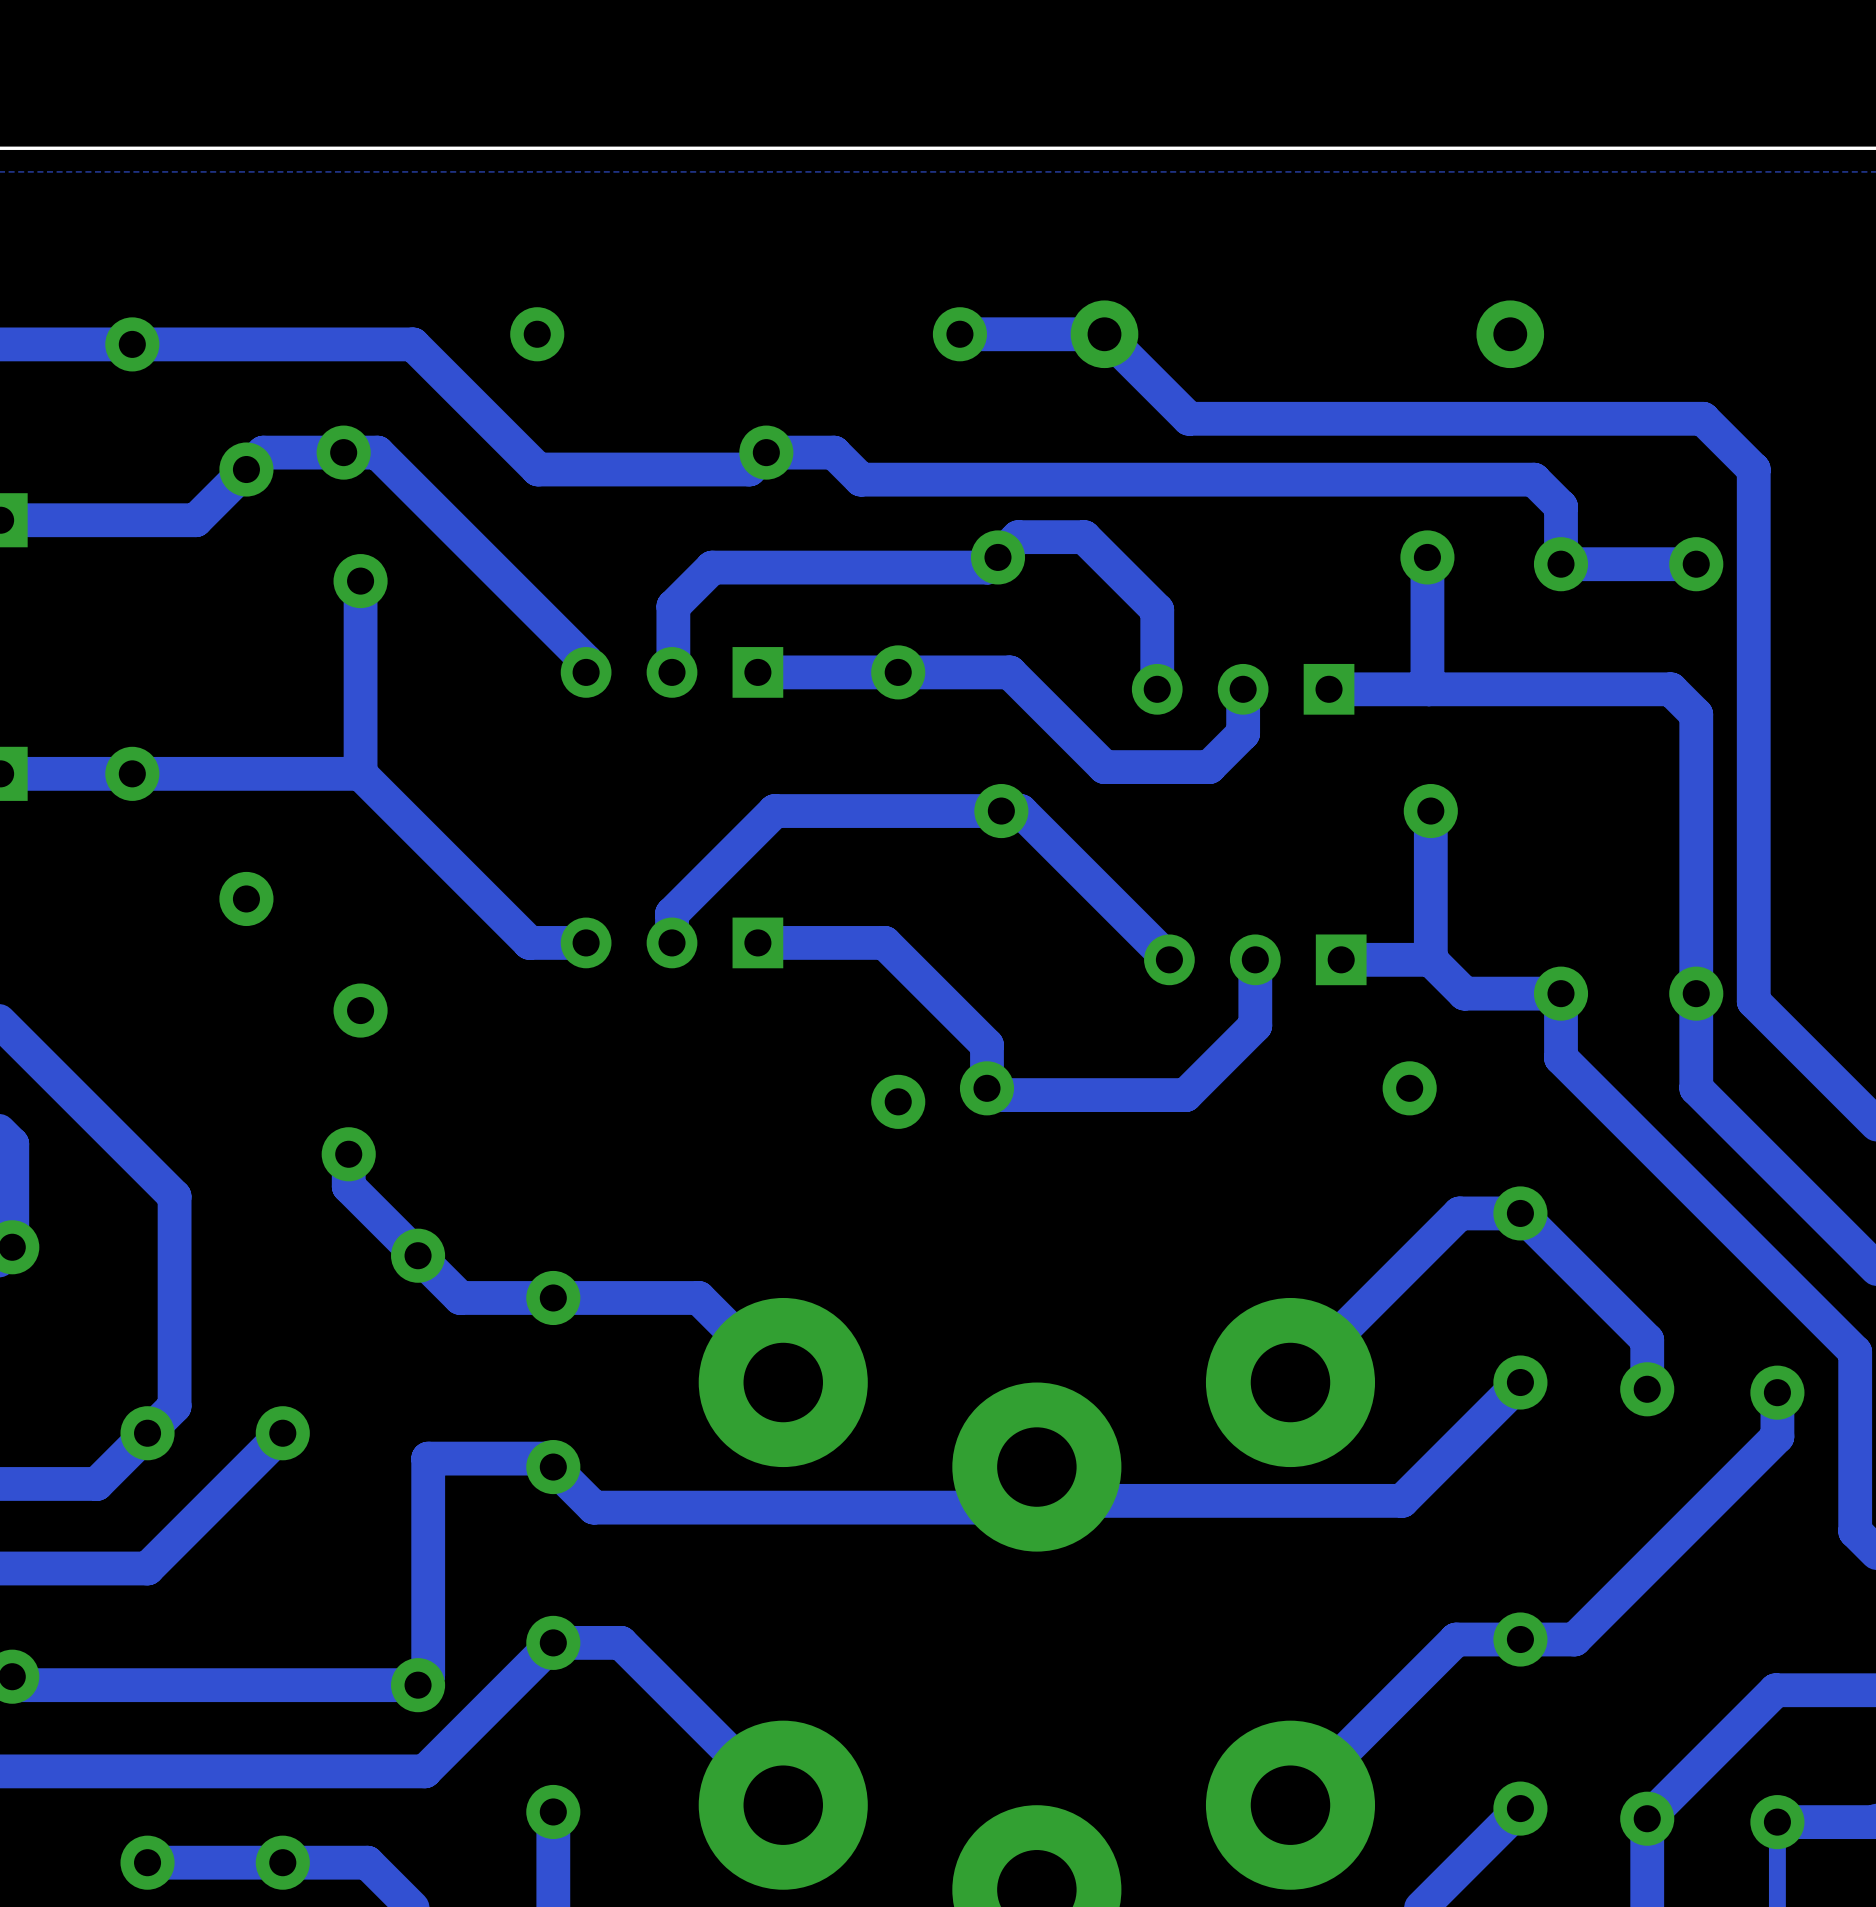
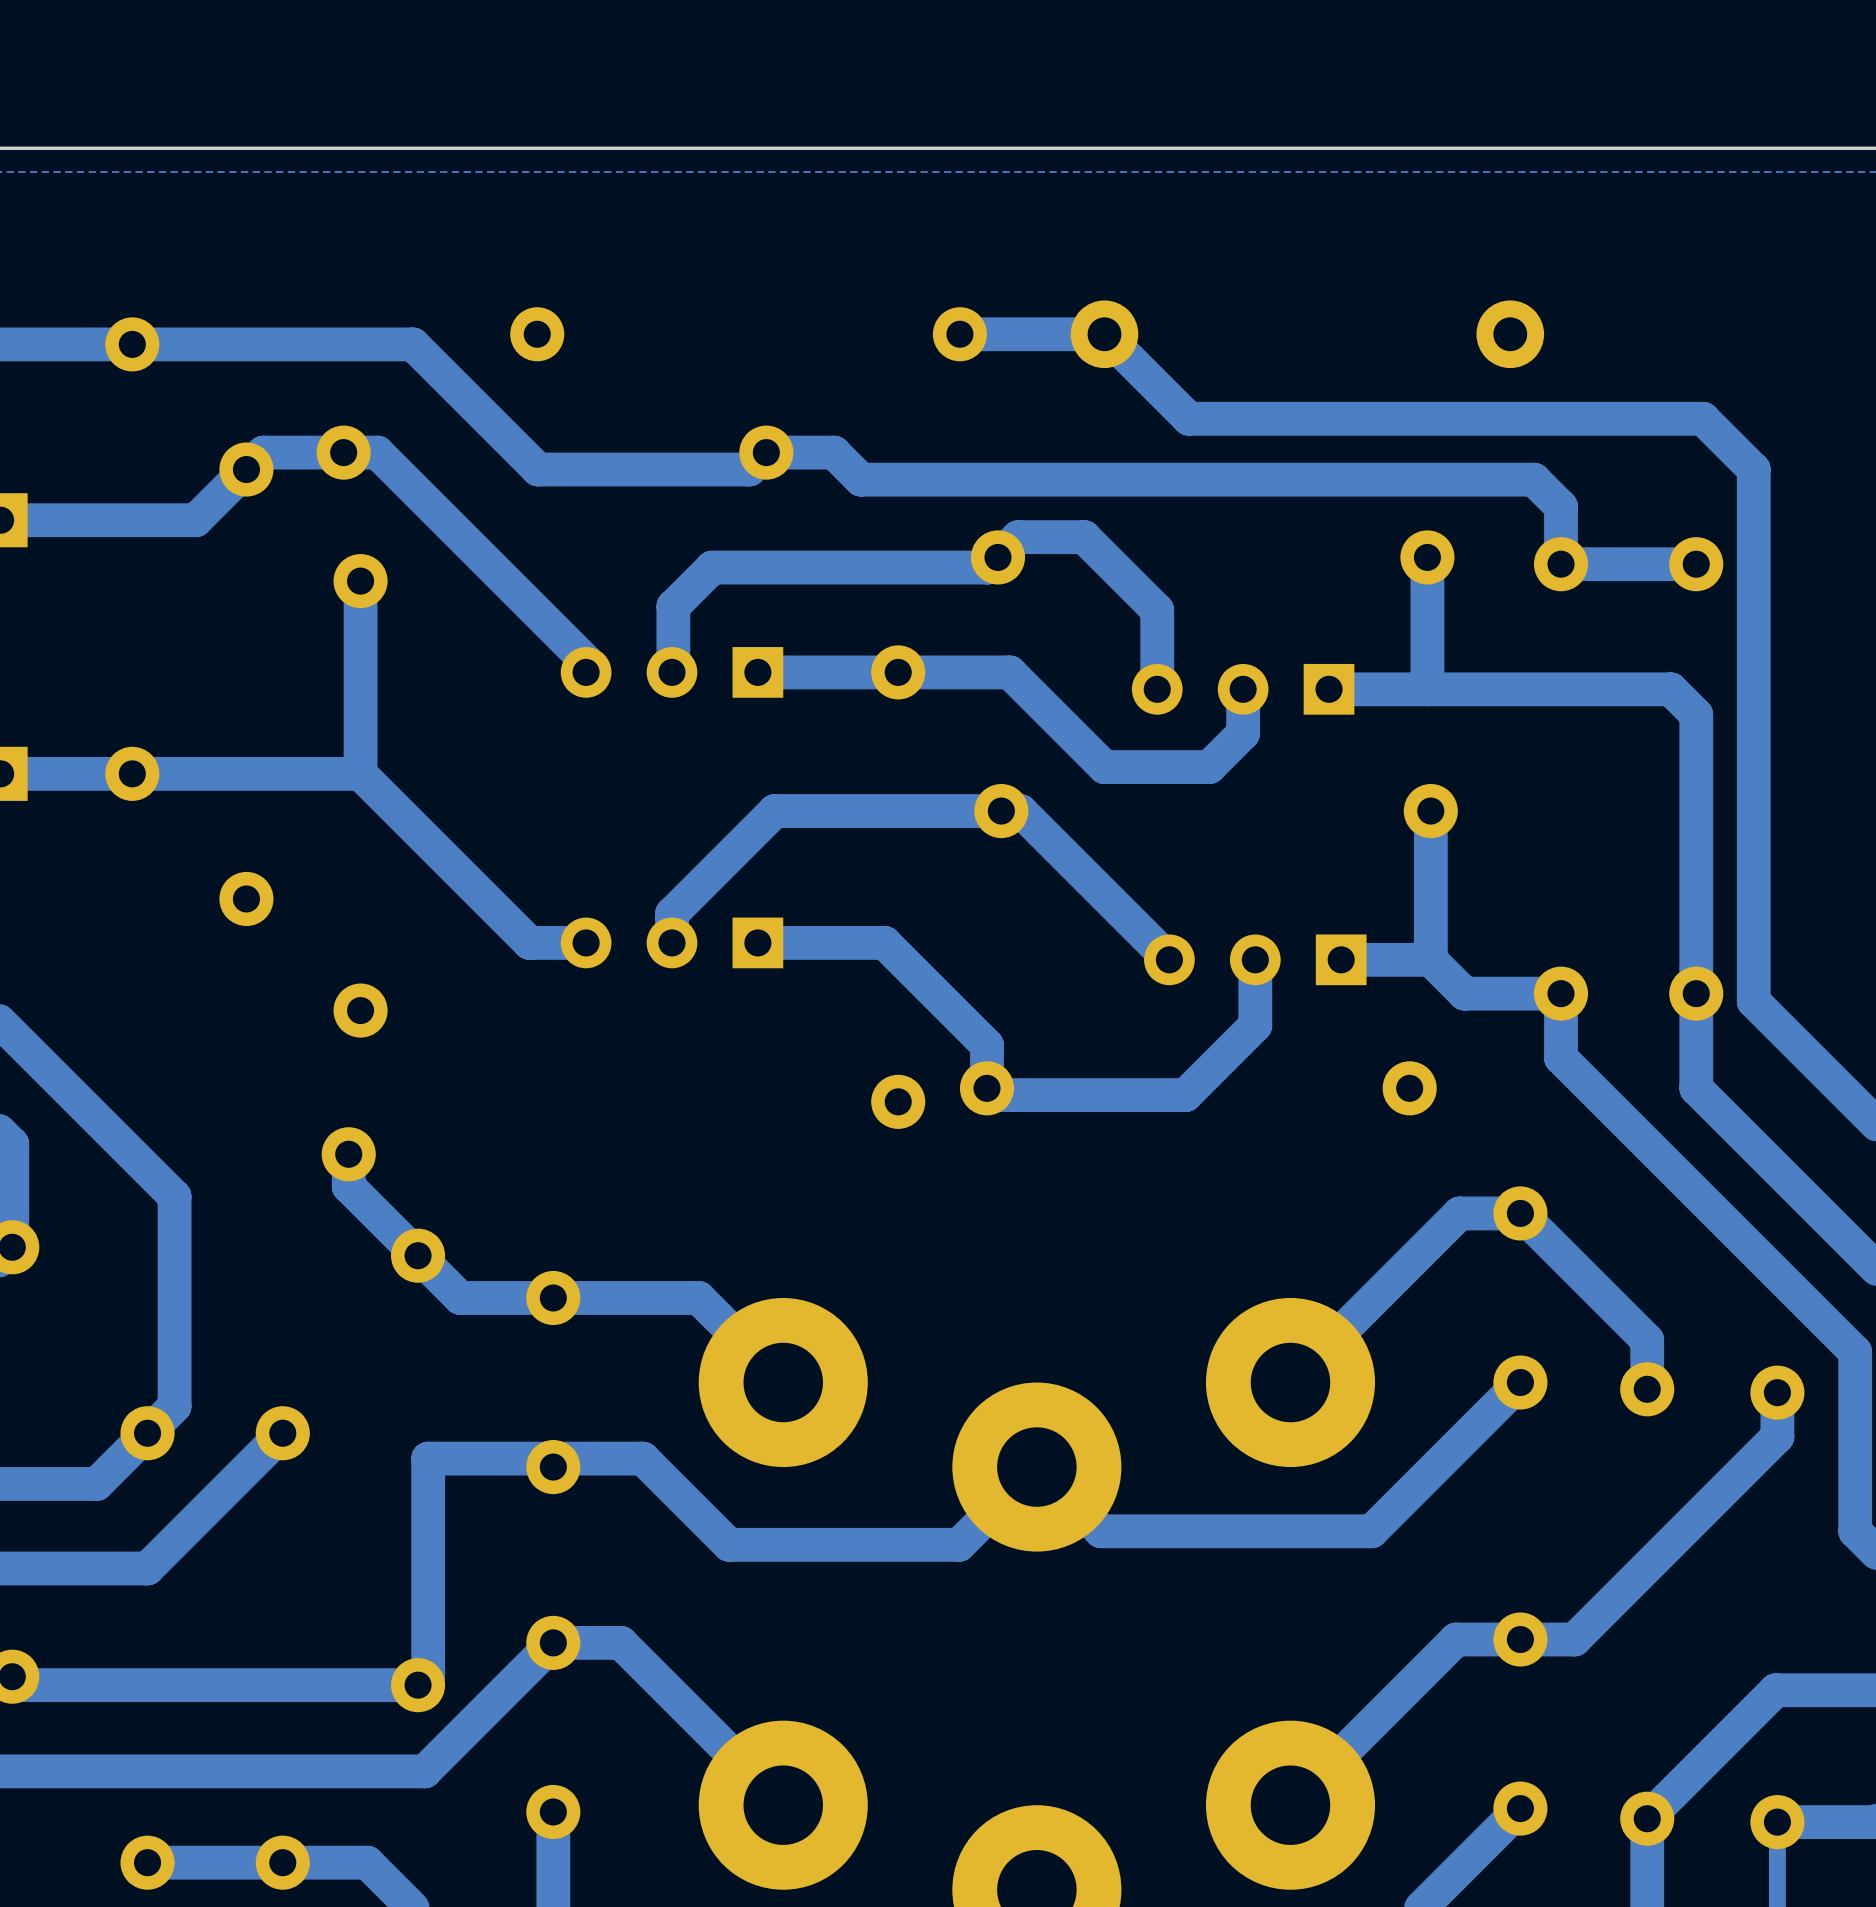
bottom track: (544, 1458) (593, 1507) (996, 1507) -> (544, 1458) (642, 1458) (729, 1544) (959, 1544) (996, 1507)
bottom track: (1402, 1500) (1070, 1500) -> (1402, 1500) (1371, 1531) (1101, 1531) (1070, 1500)

